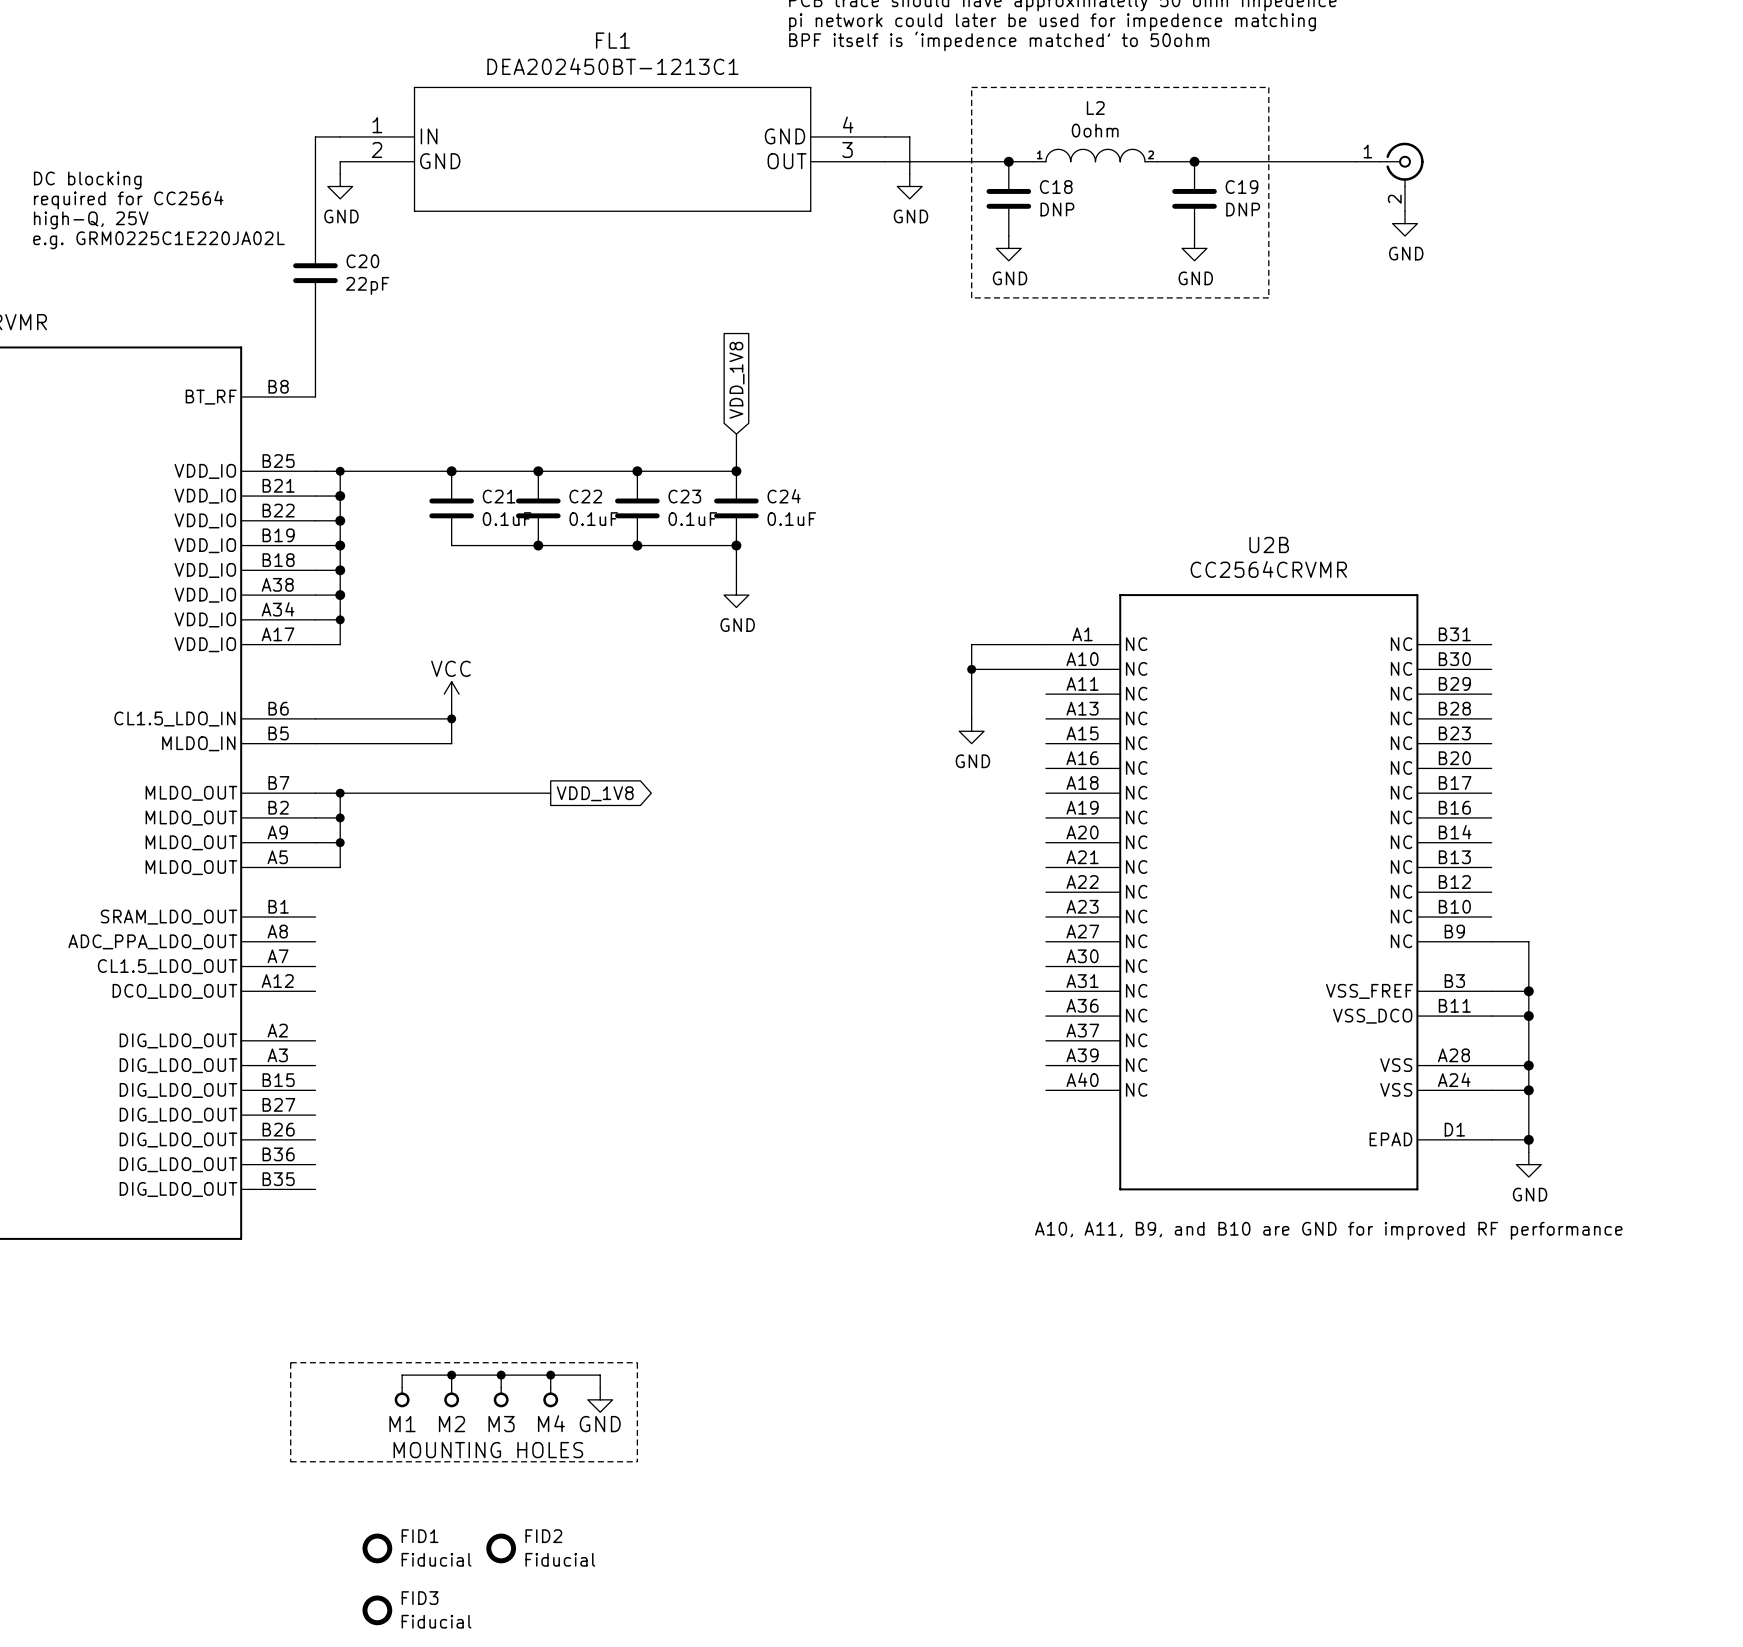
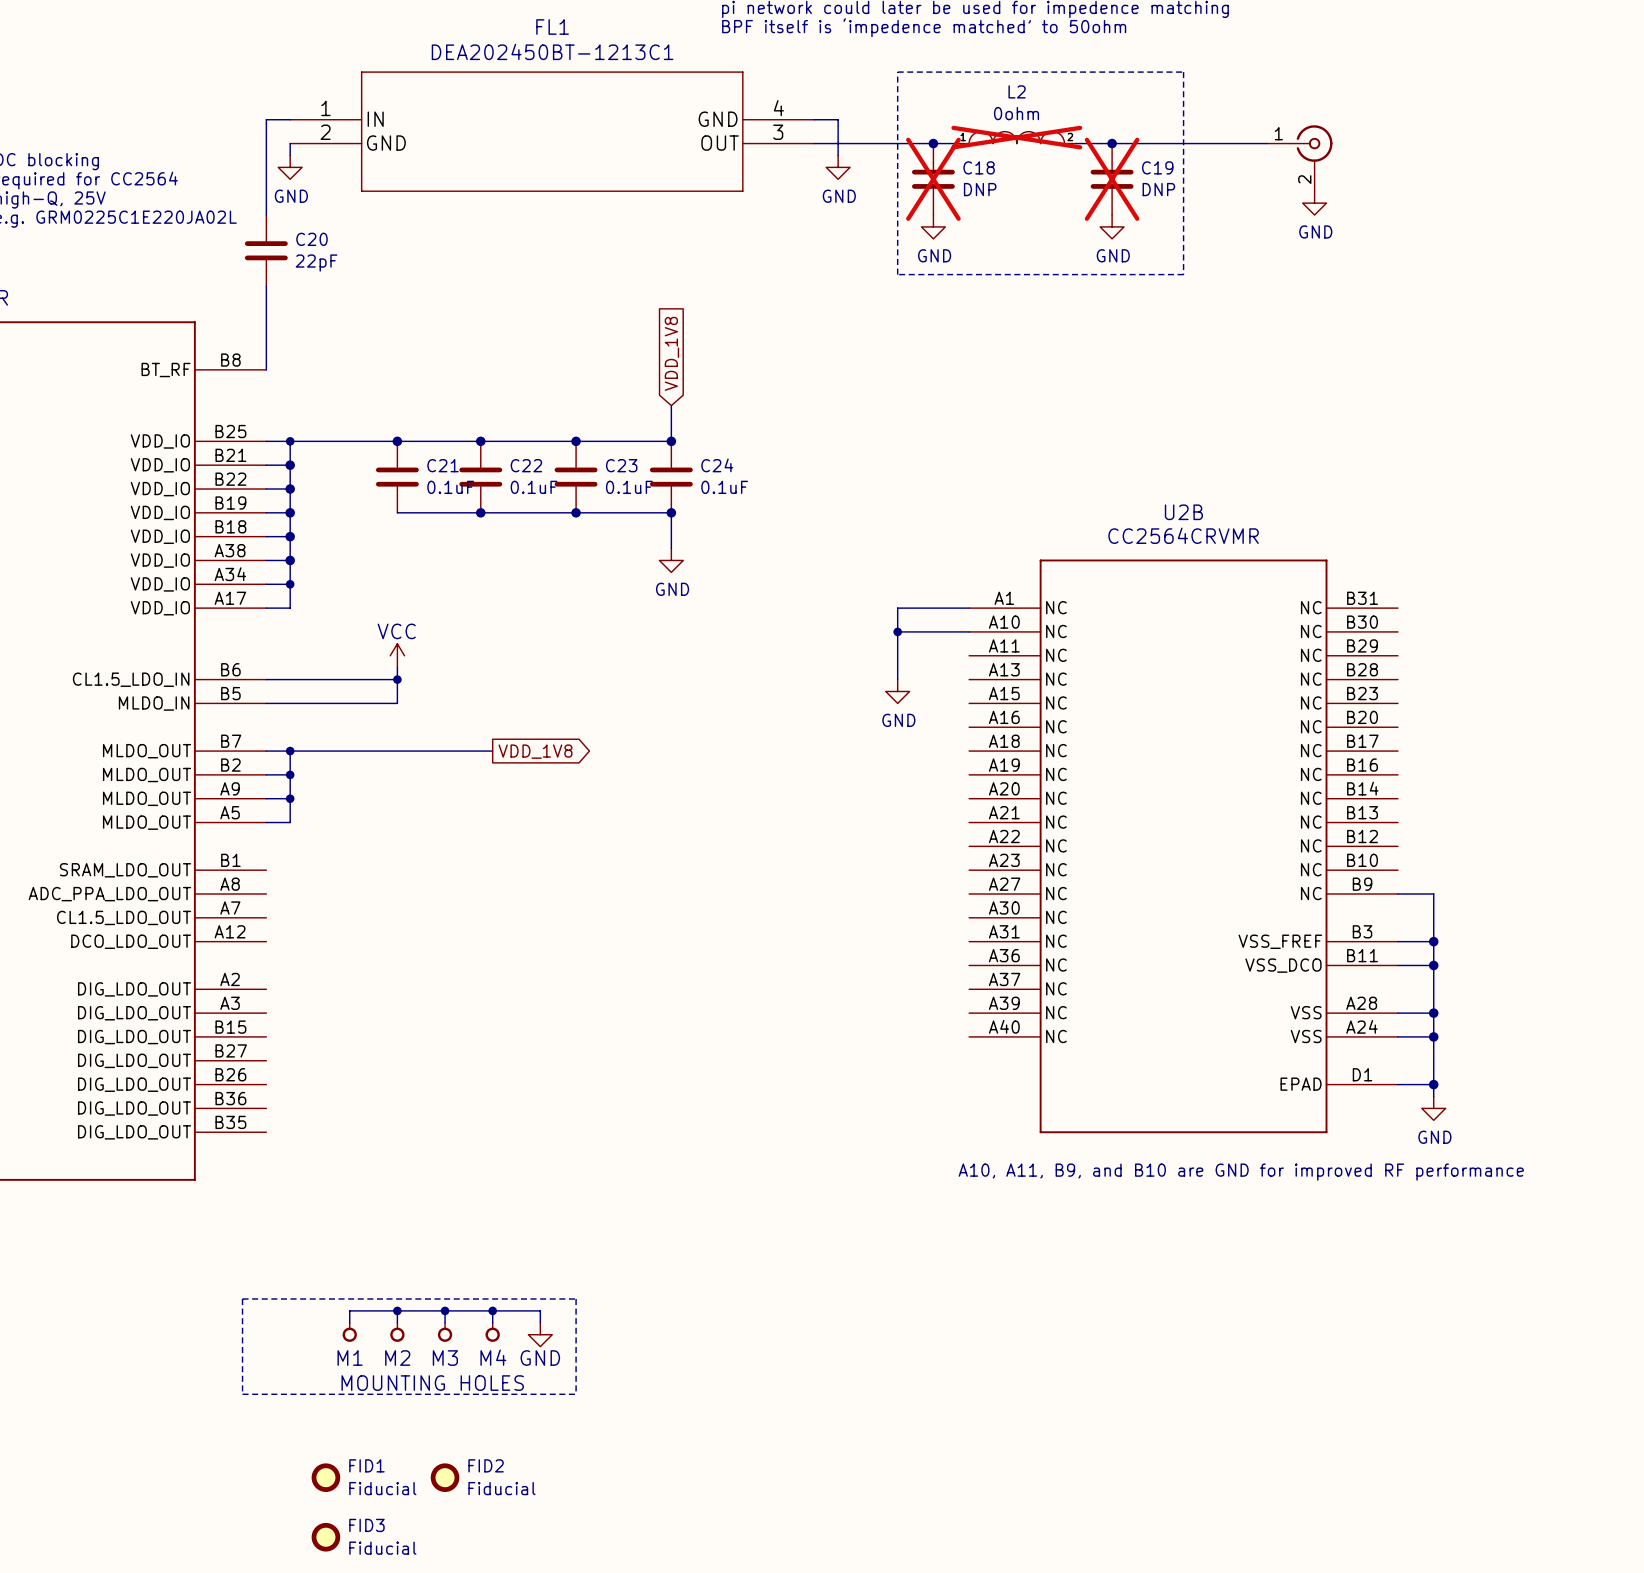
L2 do-not-place cross: none -> (1016, 137)
C18 do-not-place cross: none -> (933, 179)
C19 do-not-place cross: none -> (1112, 179)

